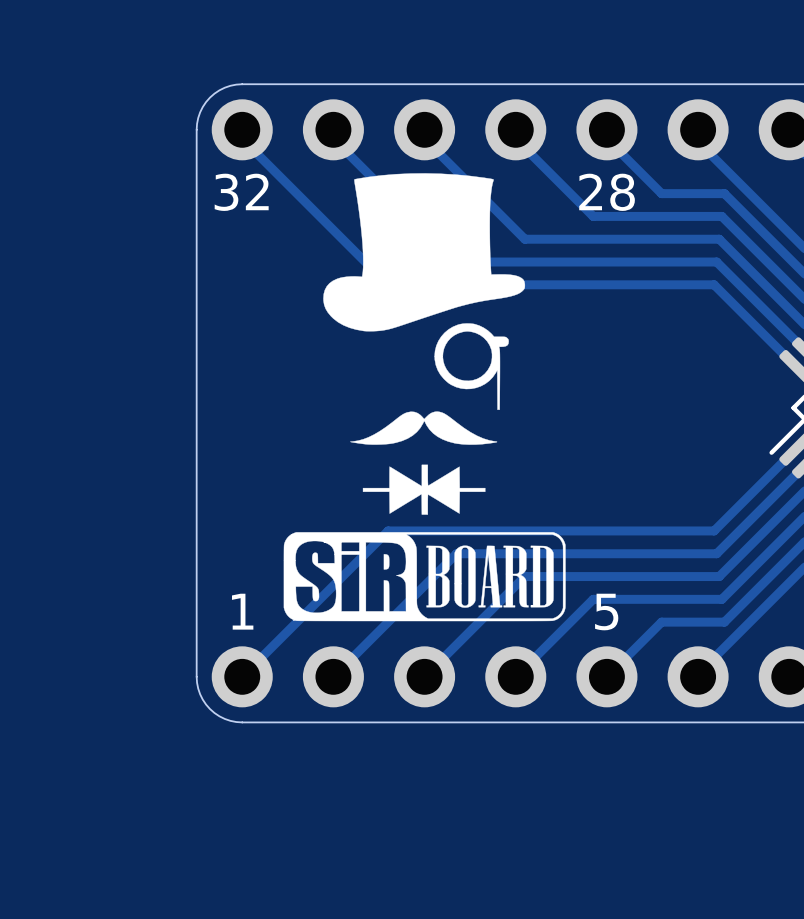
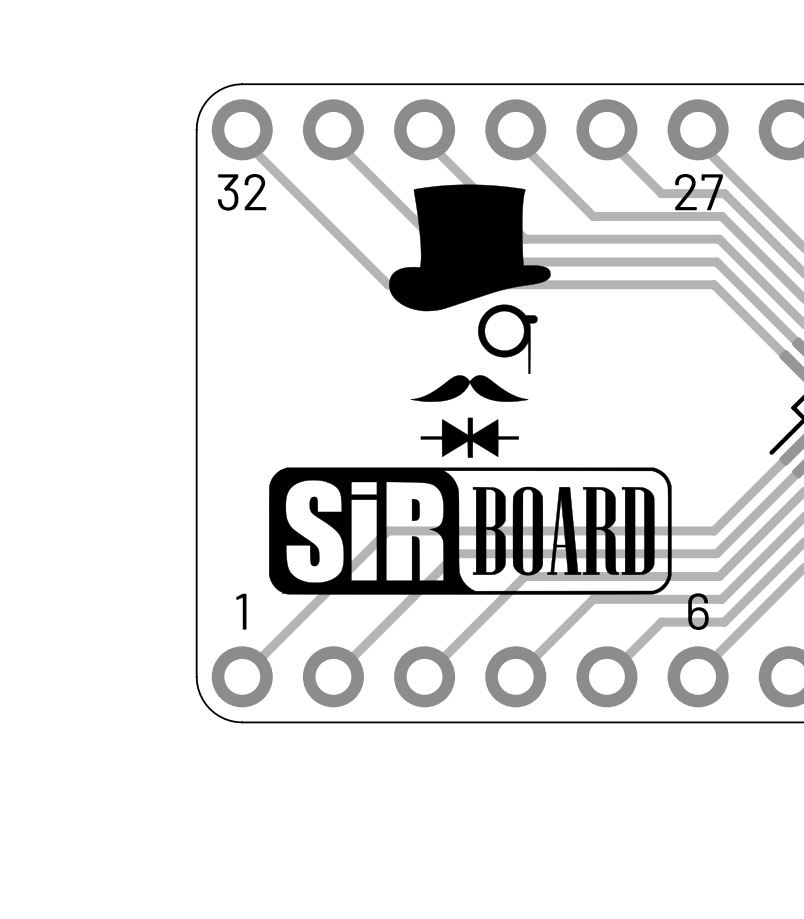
drawing: [283, 173, 566, 622] -> none
drawing: none -> [269, 184, 672, 595]
text: none -> 27 (699, 192)
text: 28 (607, 192) -> none
text: none -> 6 (698, 611)
text: 5 (606, 612) -> none

